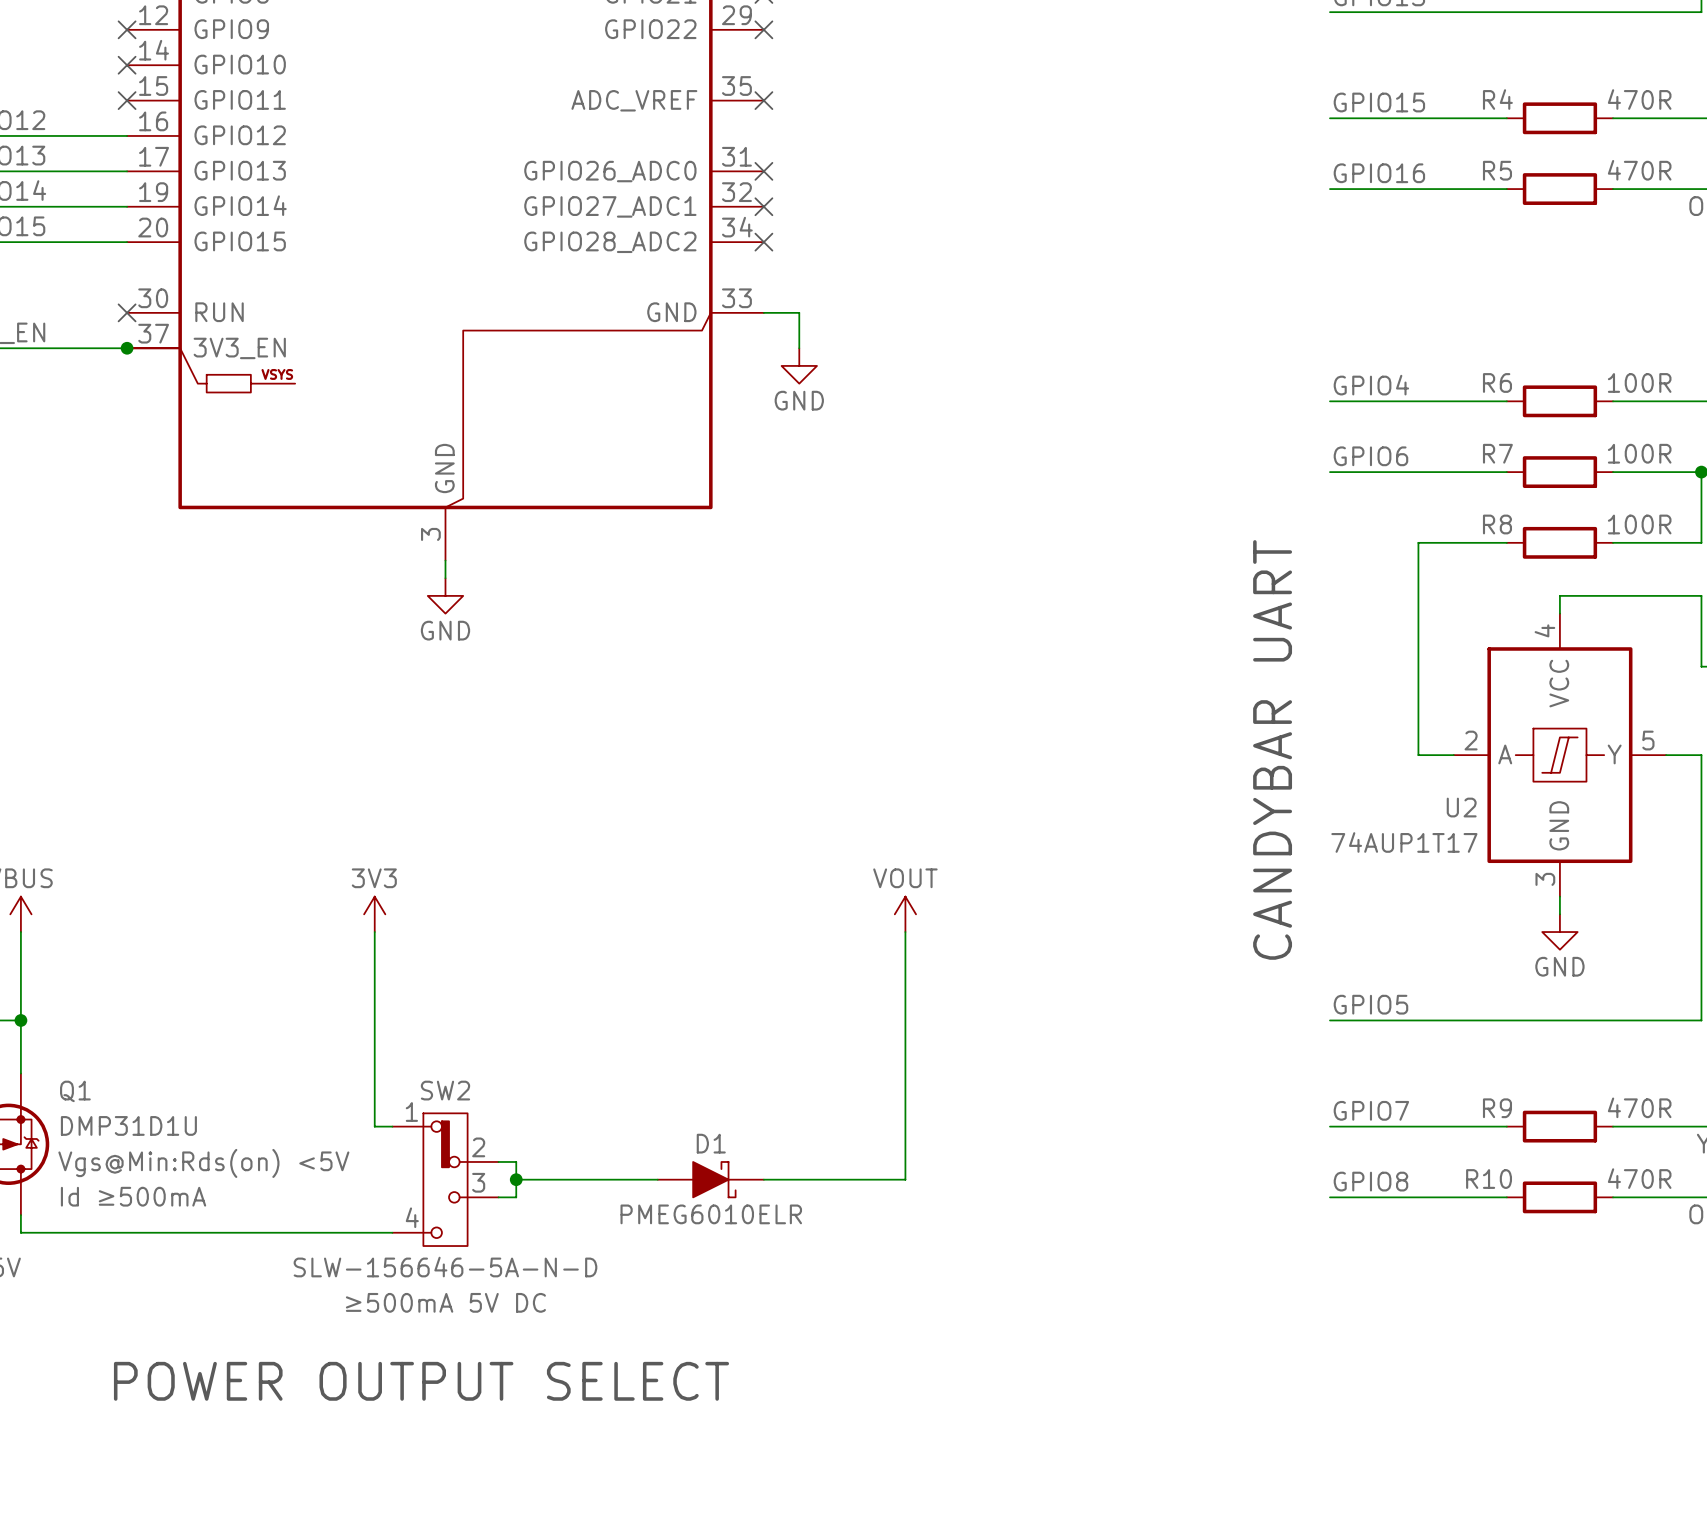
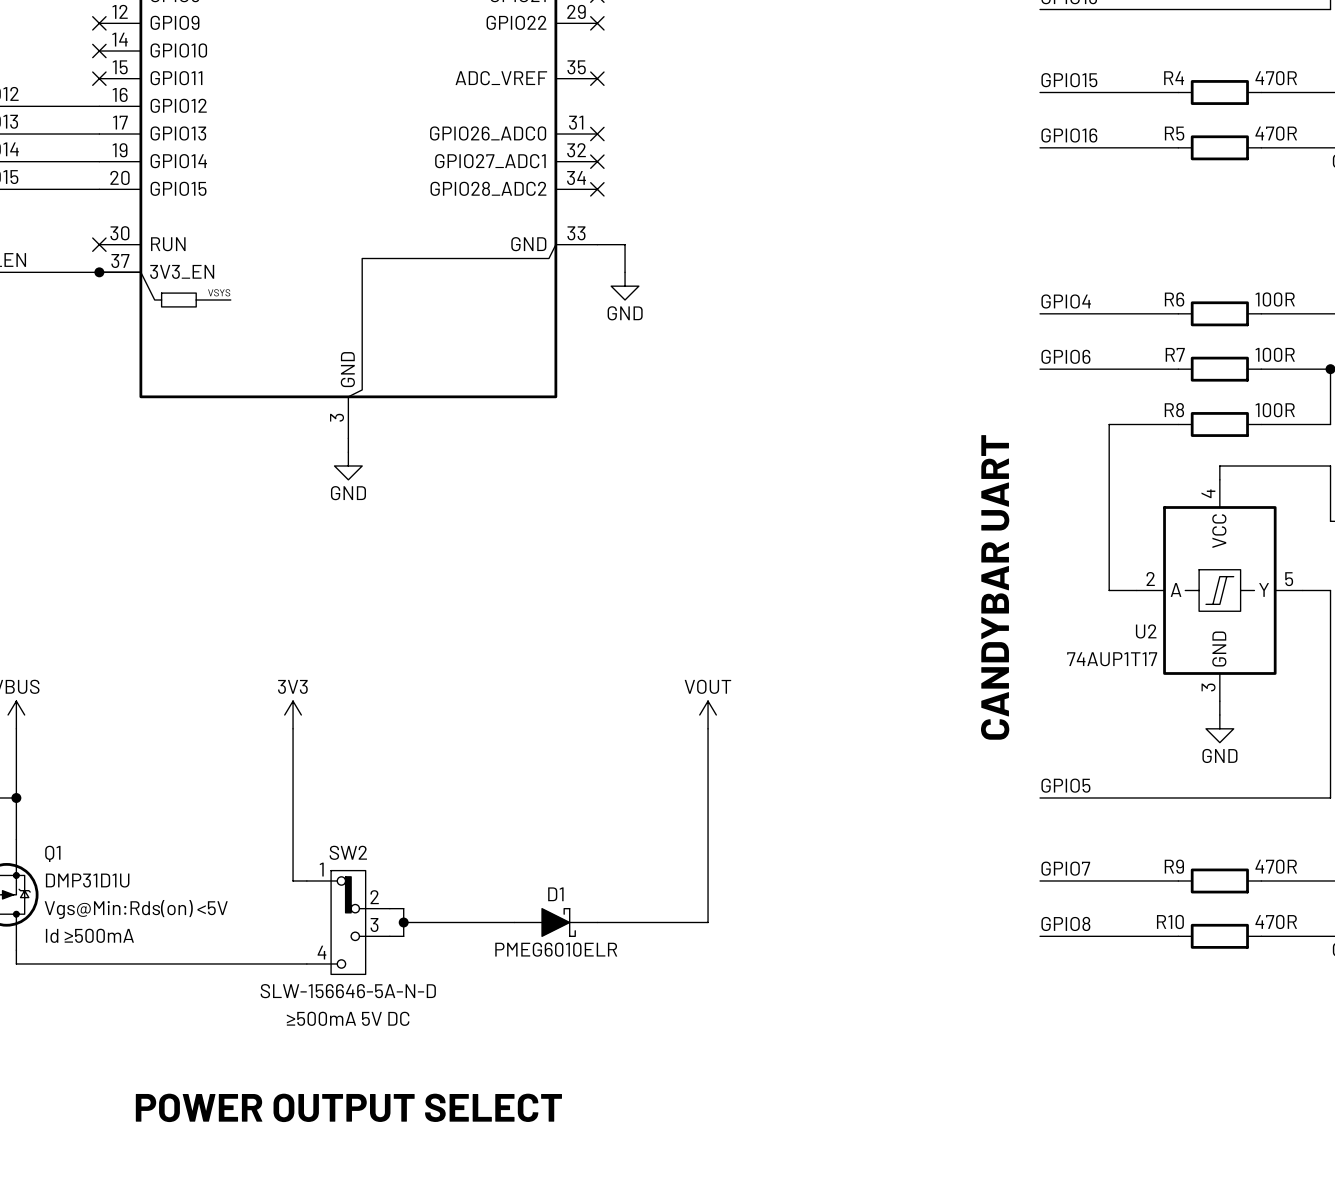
text position: POWER OUTPUT SELECT (421, 1381) -> POWER OUTPUT SELECT (348, 1107)

